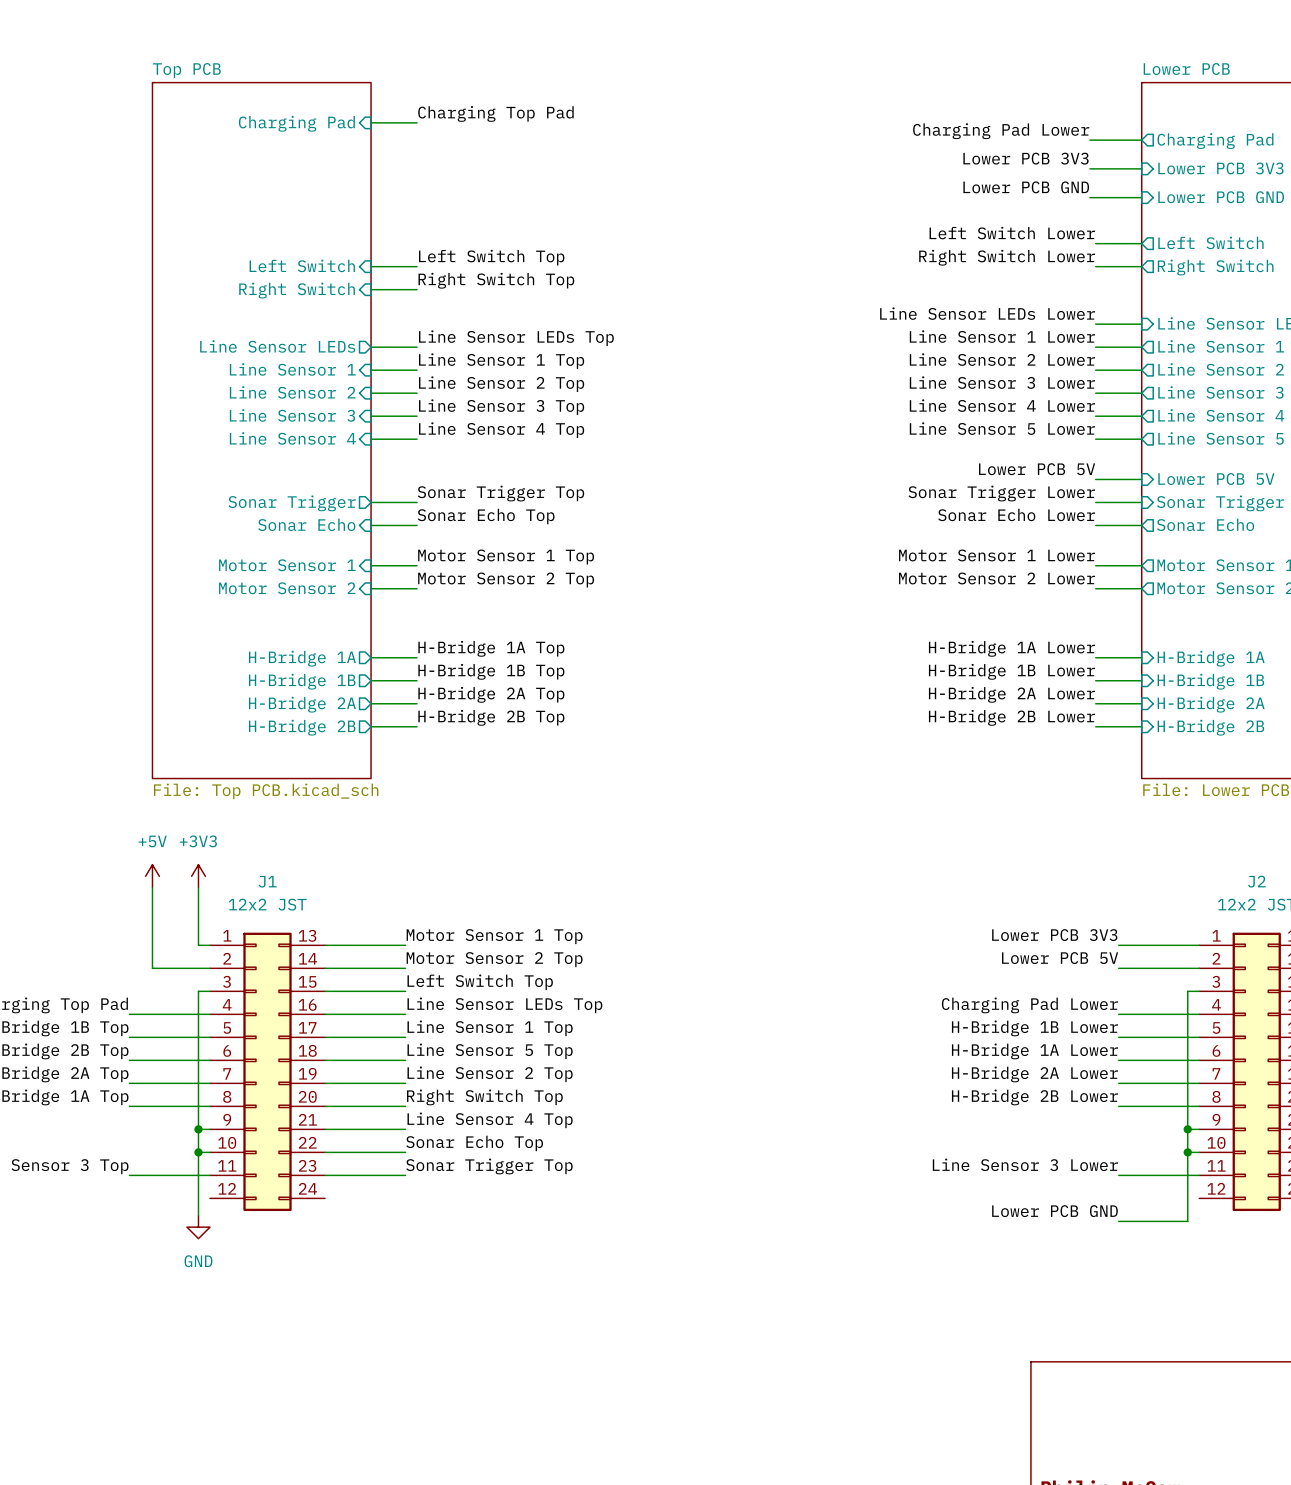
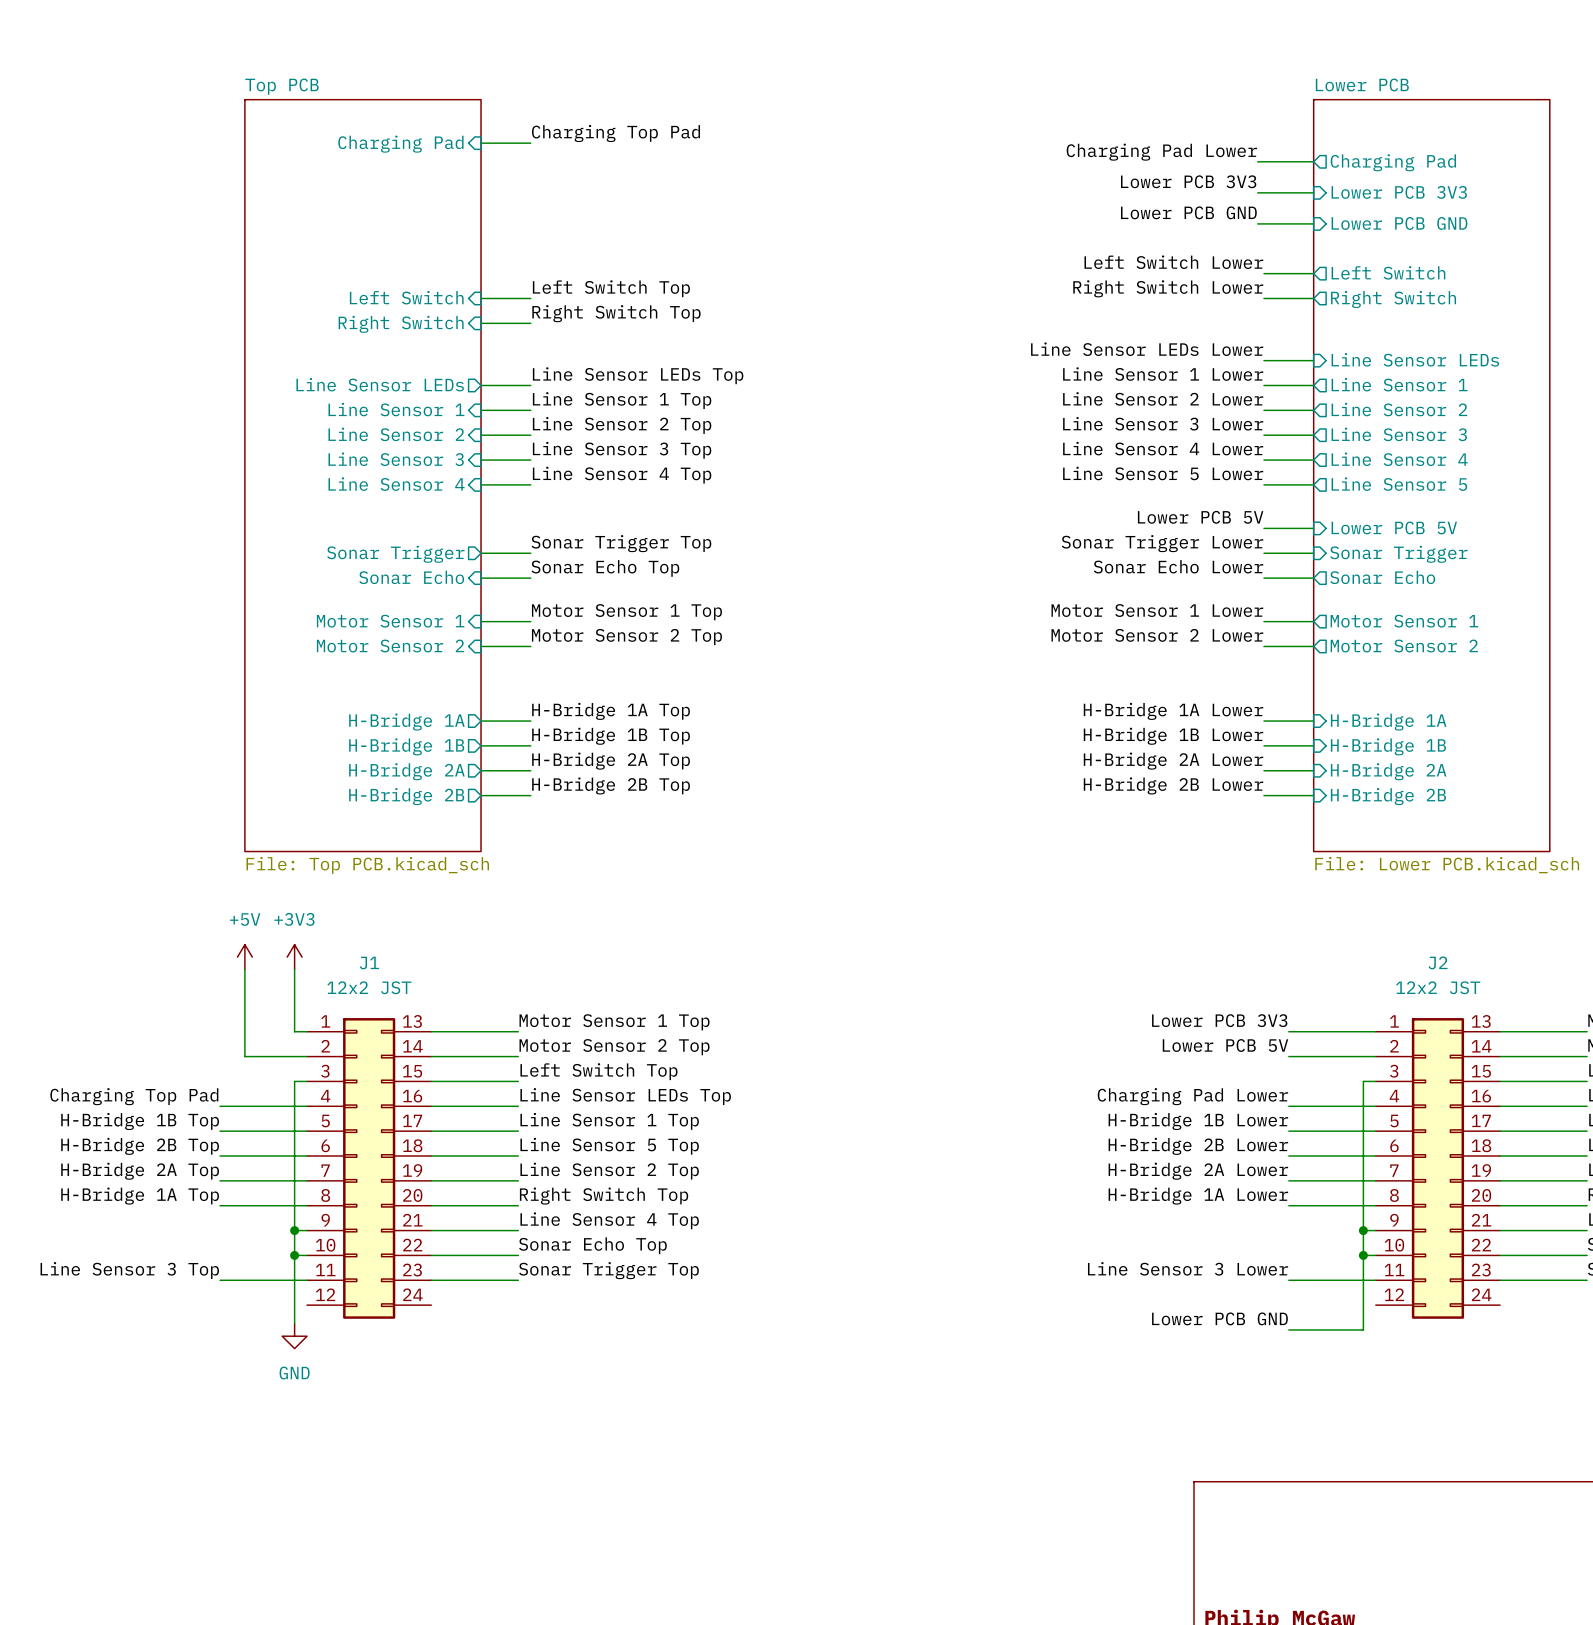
label: H-Bridge 1A Lower (1034, 1051) -> H-Bridge 2B Lower (1198, 1146)
label: H-Bridge 2B Lower (1034, 1097) -> H-Bridge 1A Lower (1198, 1196)

